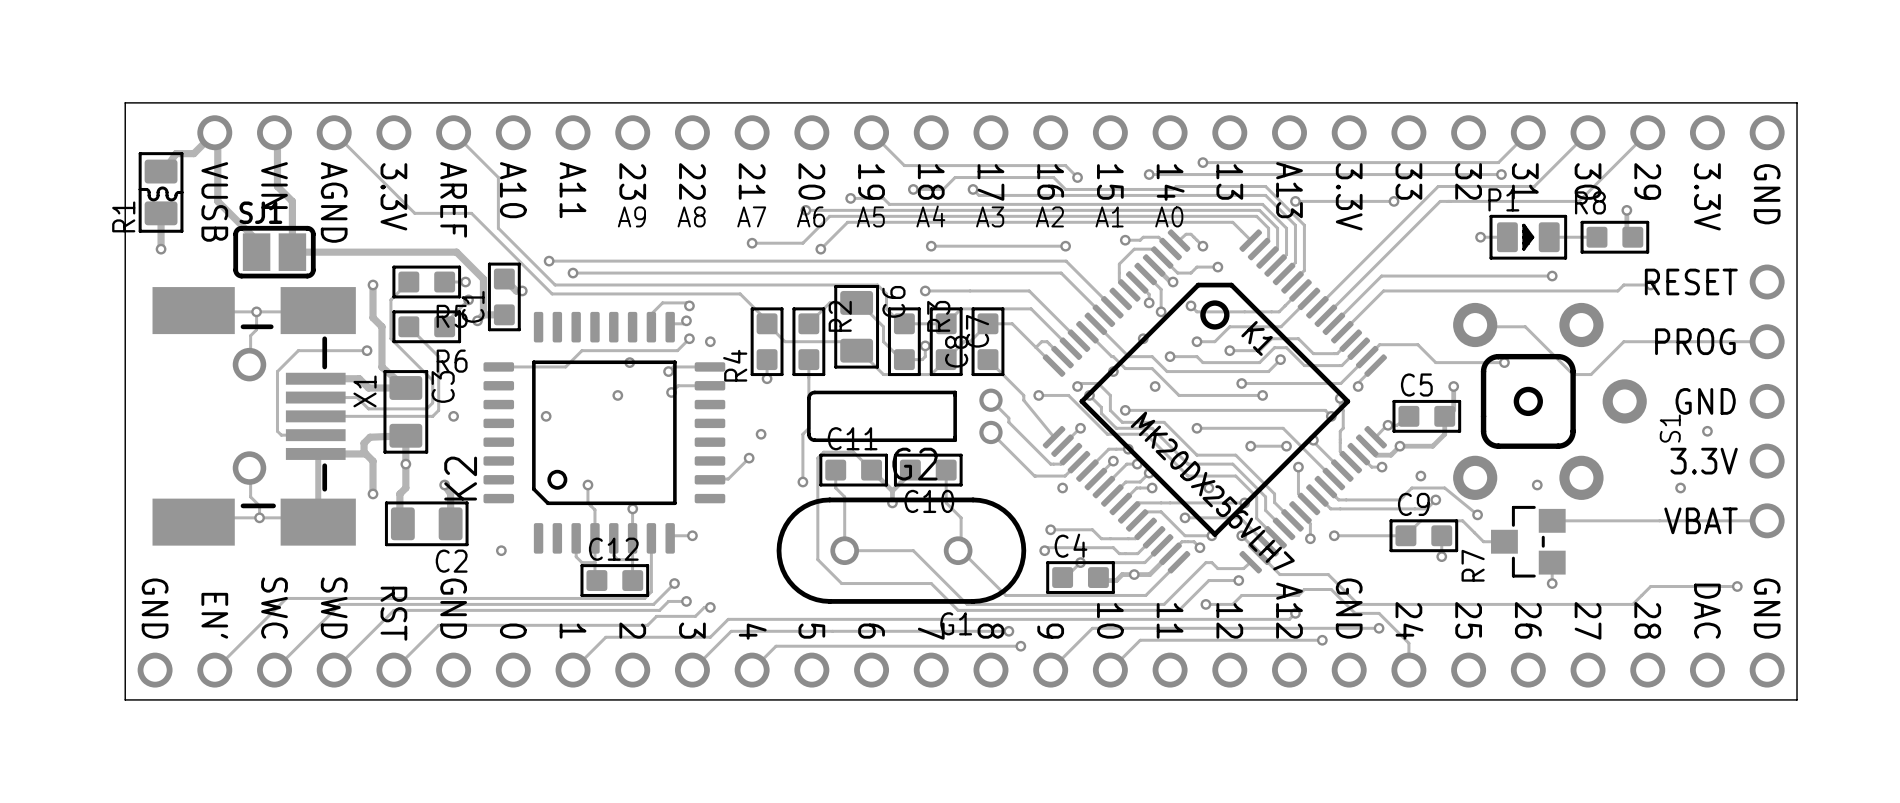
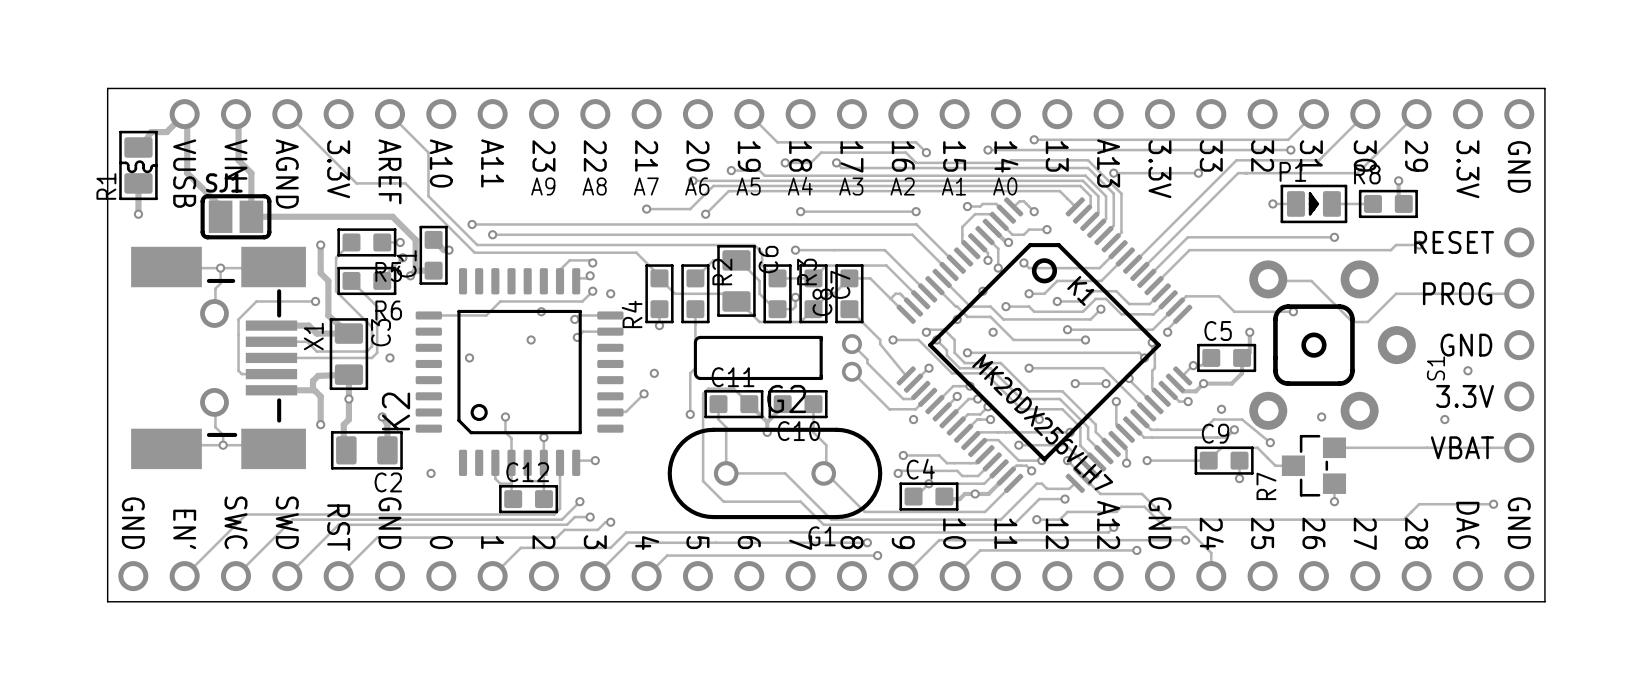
track: (319, 452) (318, 522) -> none

